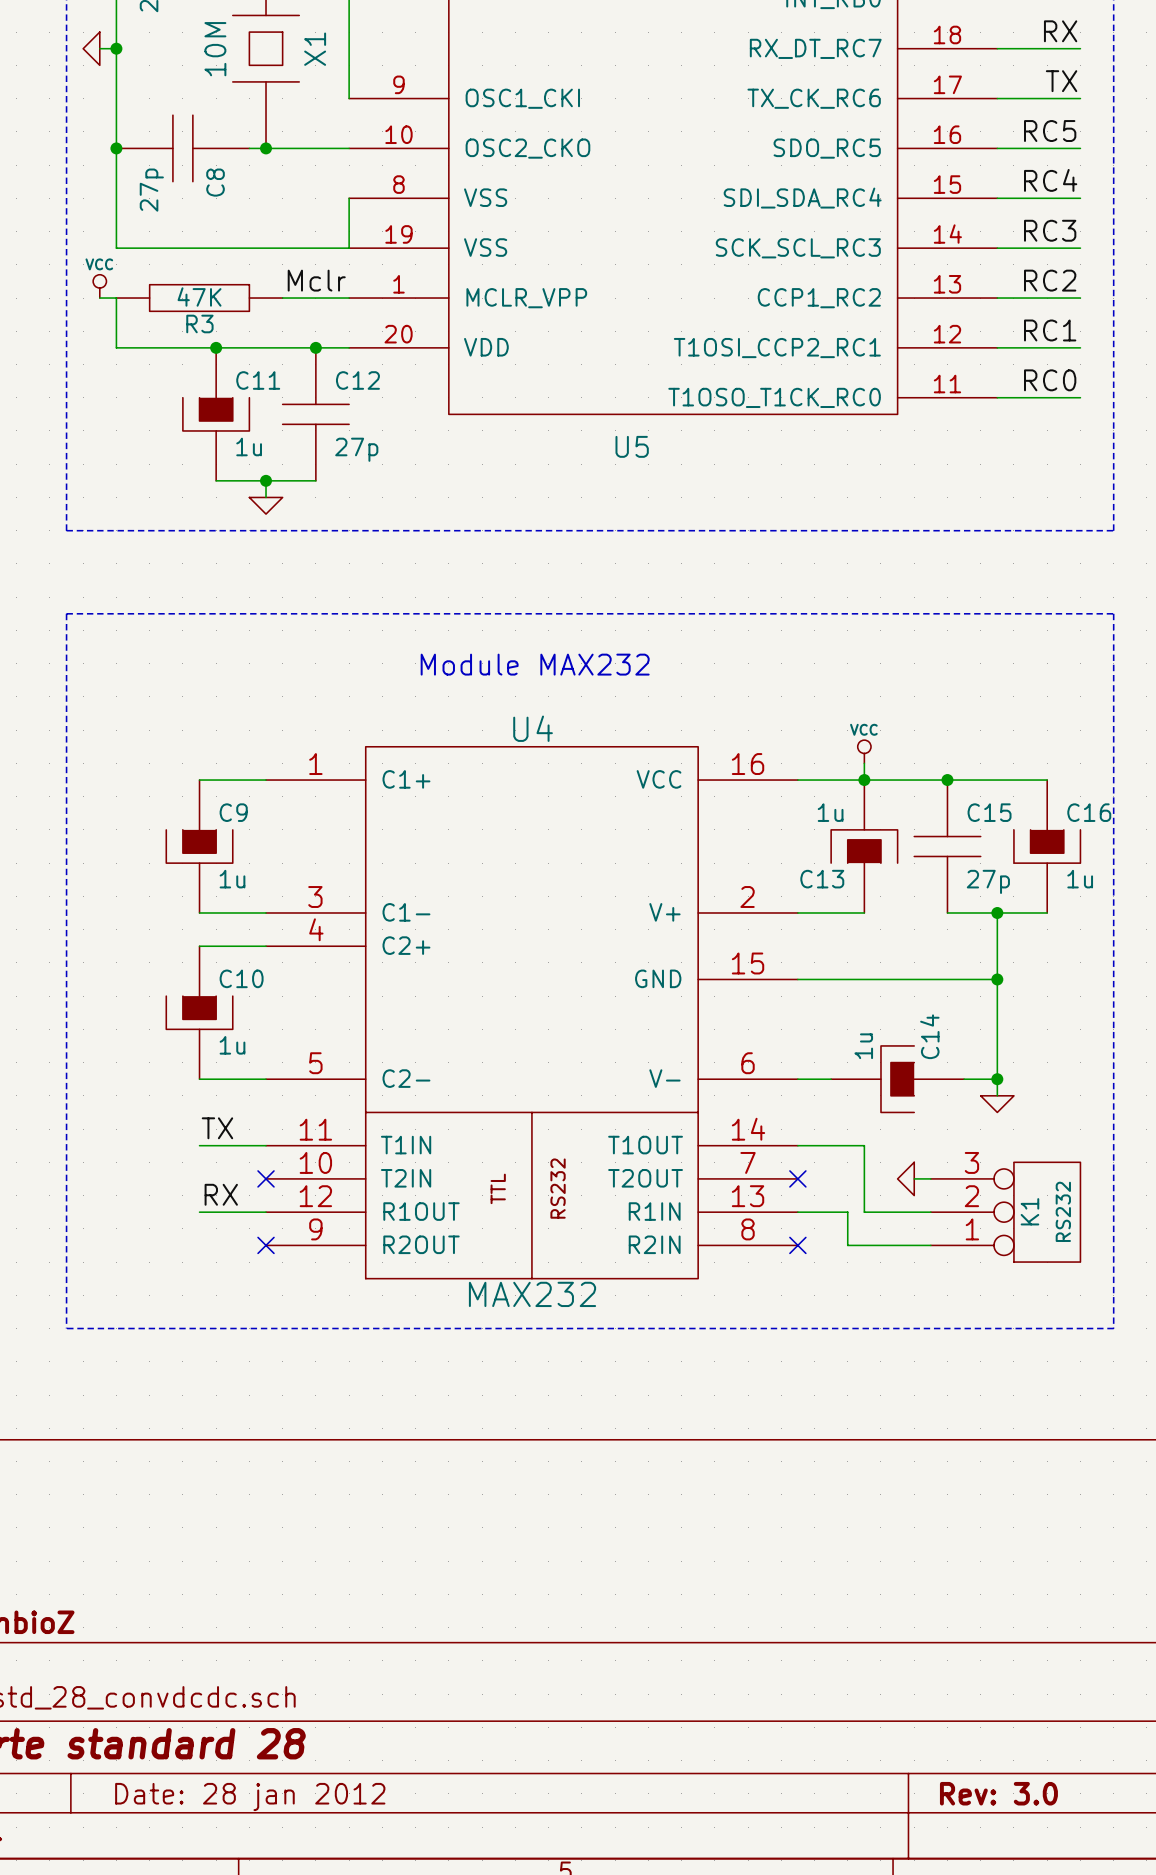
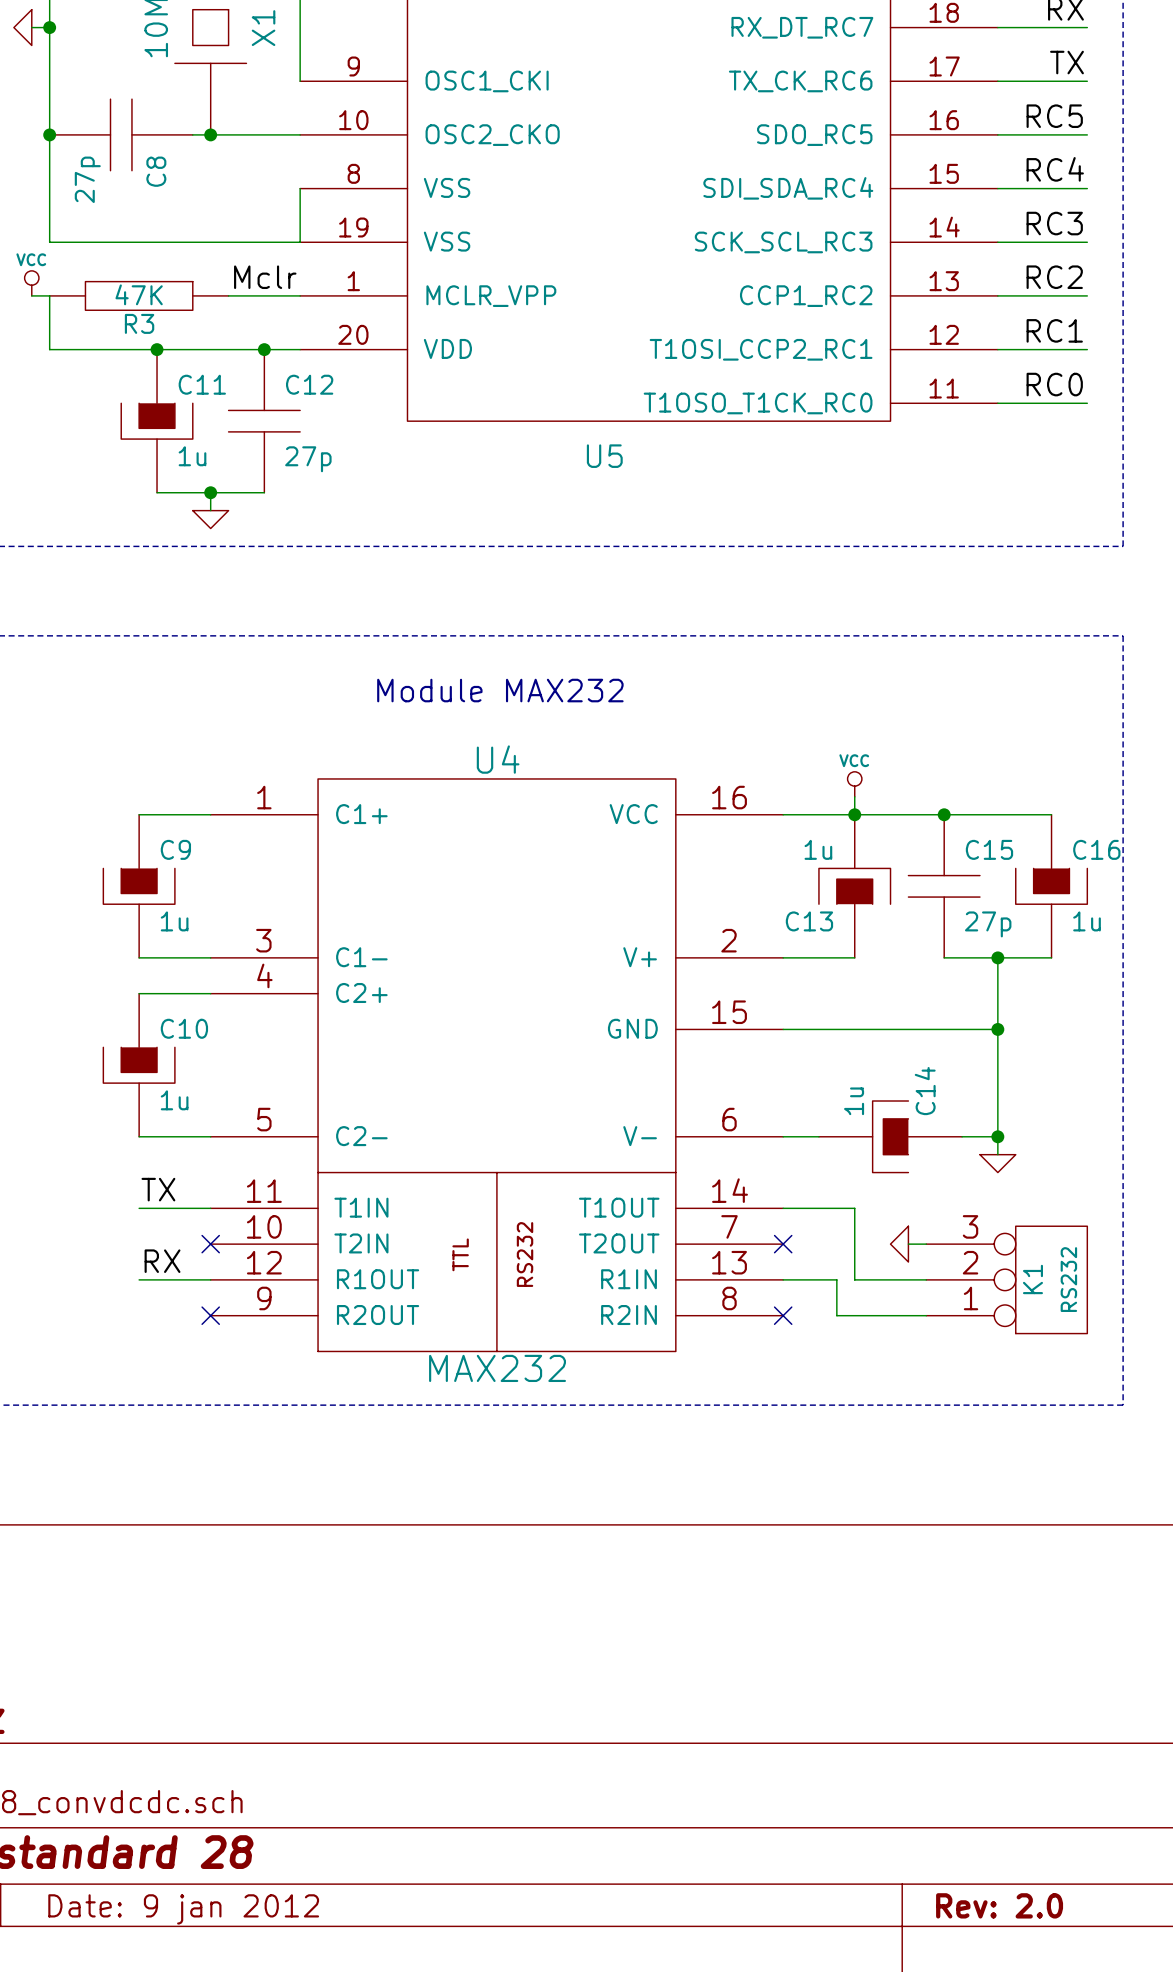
title block: Rev: 3.0 (998, 1793) -> Rev: 2.0 (999, 1905)
title block: Date: 28 jan 2012 (250, 1796) -> Date: 9 jan 2012 (183, 1909)

